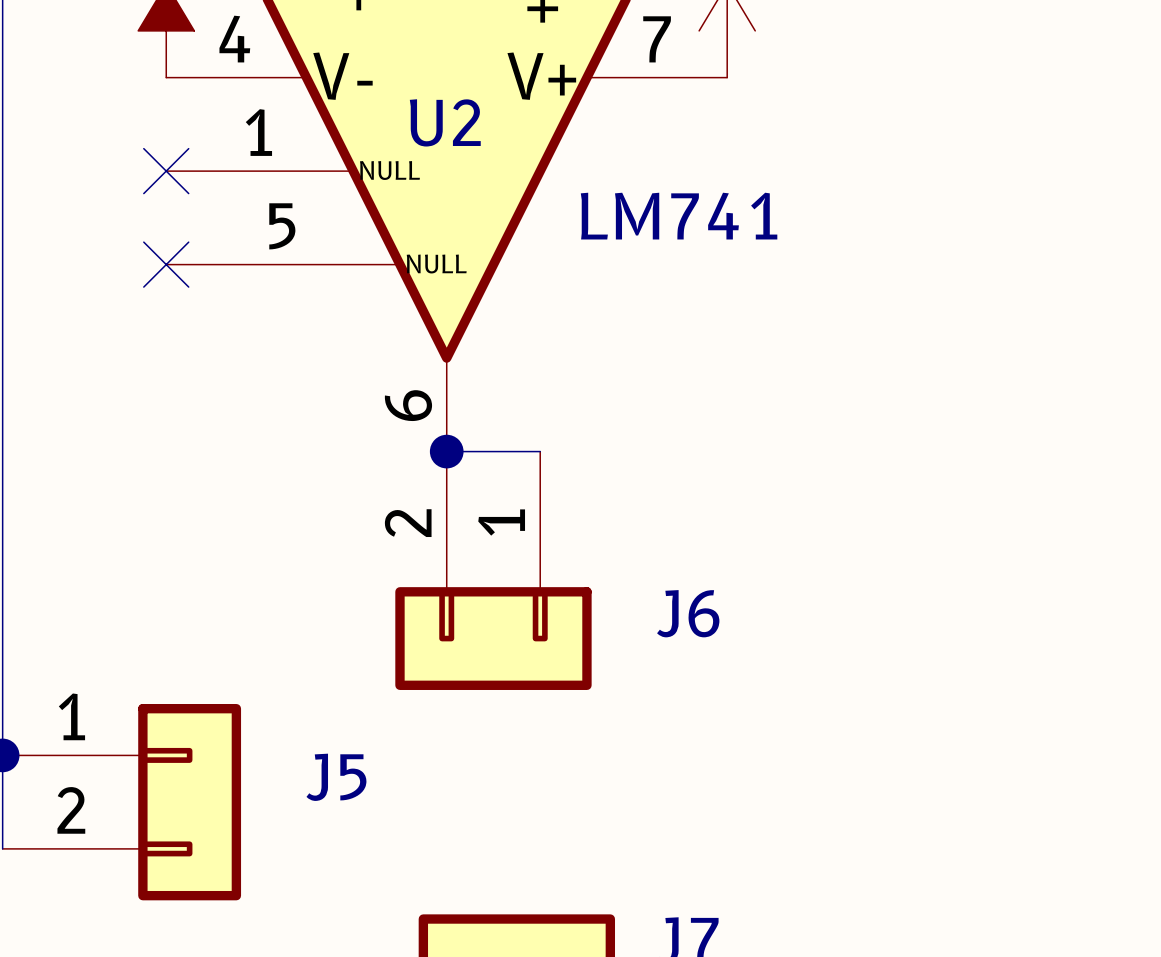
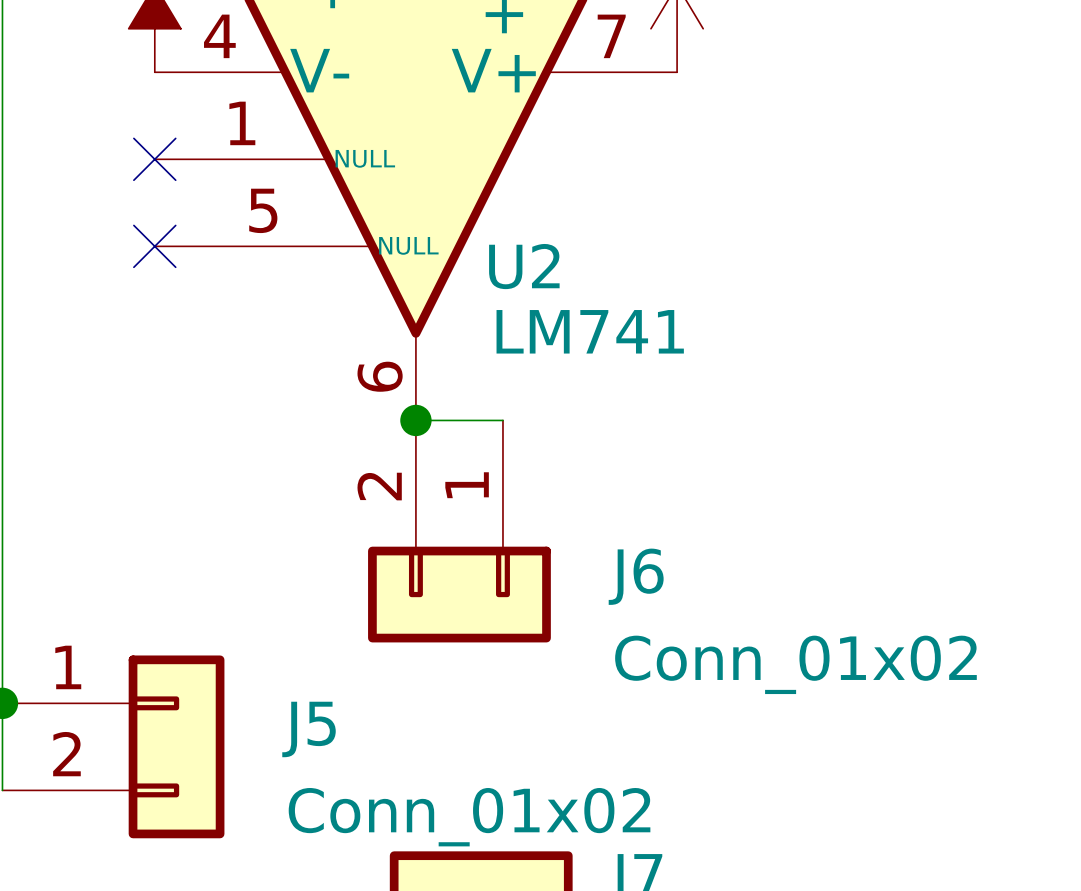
U2 name position: U2 (445, 122) -> U2 (524, 266)
U2 value position: LM741 (679, 216) -> LM741 (590, 331)
J6 value: none -> Conn_01x02 (795, 664)
J5 value: none -> Conn_01x02 (469, 817)

